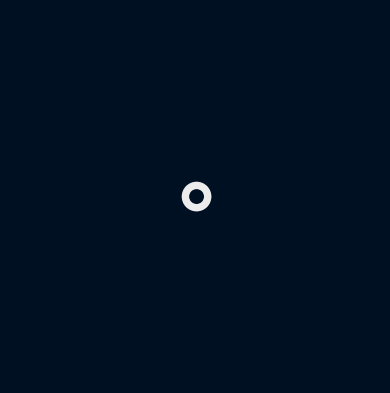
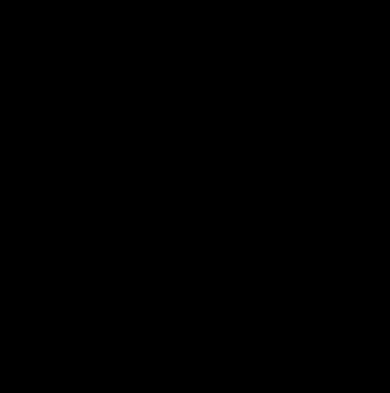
via: (196, 196) -> none

